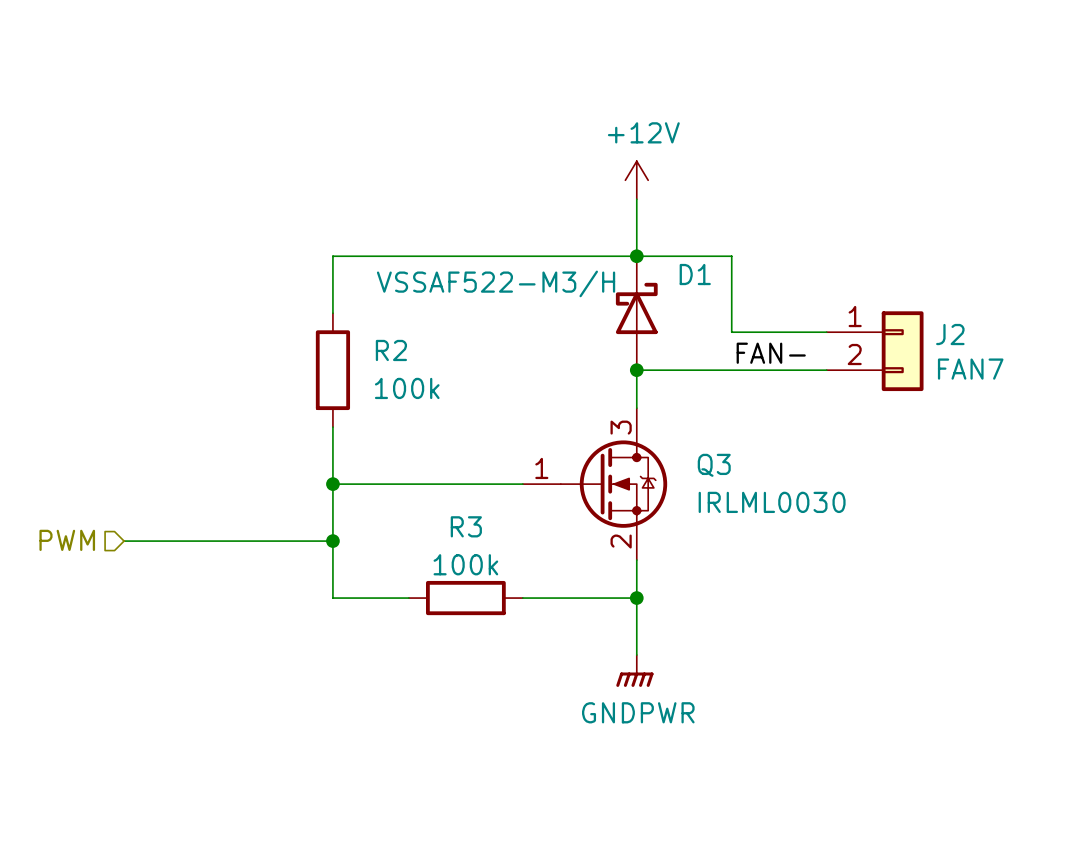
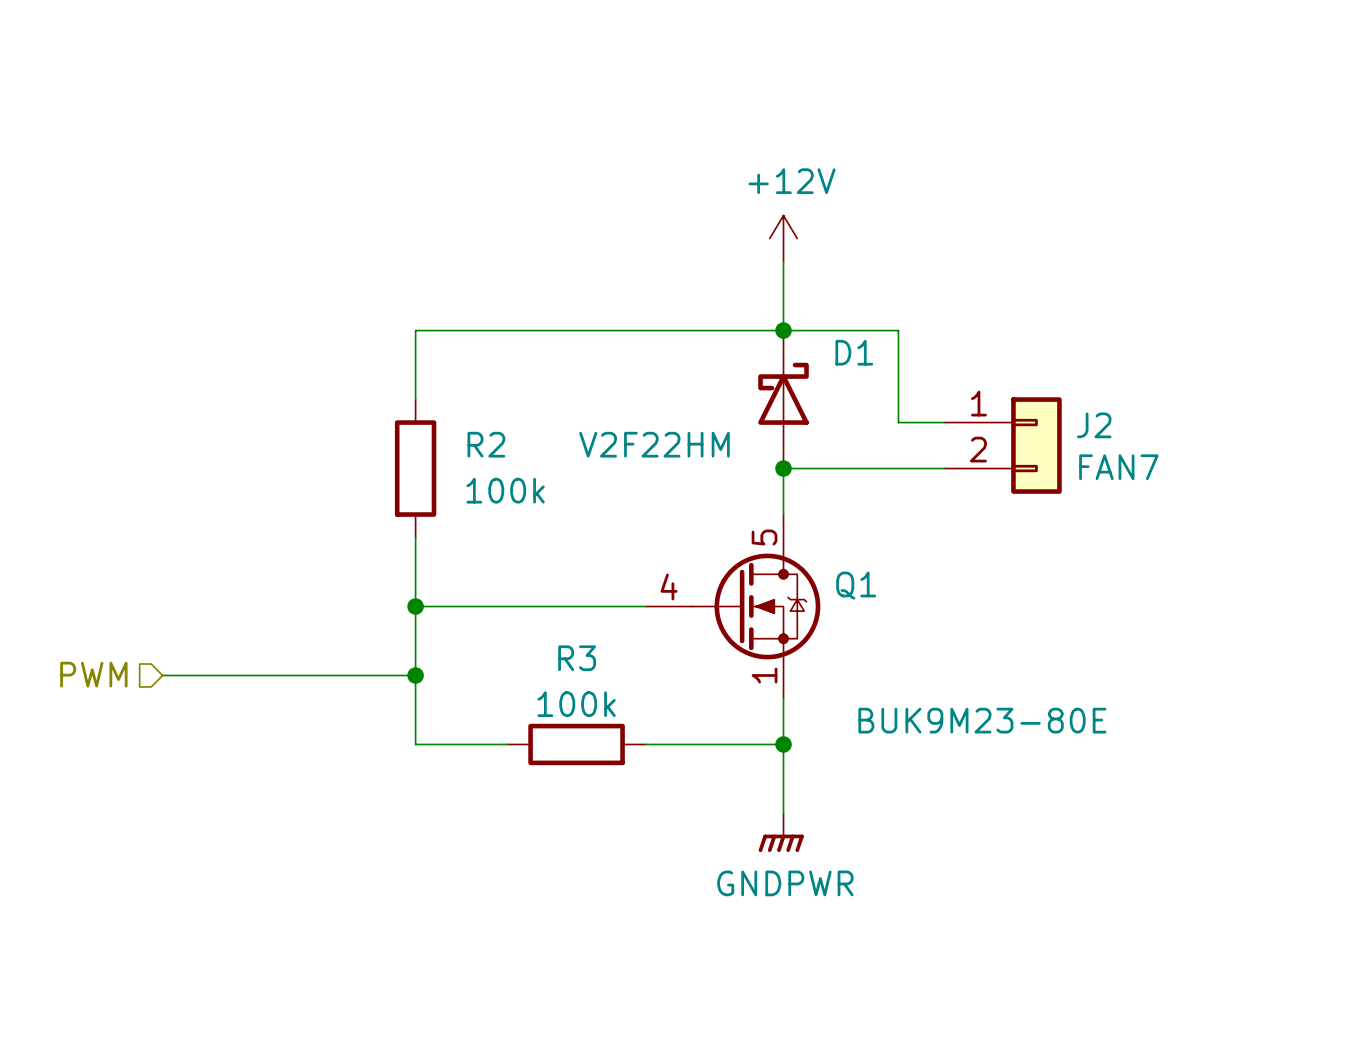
D1 value: VSSAF522-M3/H (496, 283) -> V2F22HM (654, 444)
J2 position: (875, 351) -> (1003, 445)
label: FAN- (771, 353) -> none
Q3 pin number: 3 (621, 427) -> 5 (764, 537)
Q3 name: Q3 (714, 465) -> Q1 (856, 585)
Q3 pin number: 1 (541, 468) -> 4 (669, 586)
Q3 value: IRLML0030 (772, 502) -> BUK9M23-80E (982, 720)
Q3 pin number: 2 (621, 541) -> 1 (764, 675)

